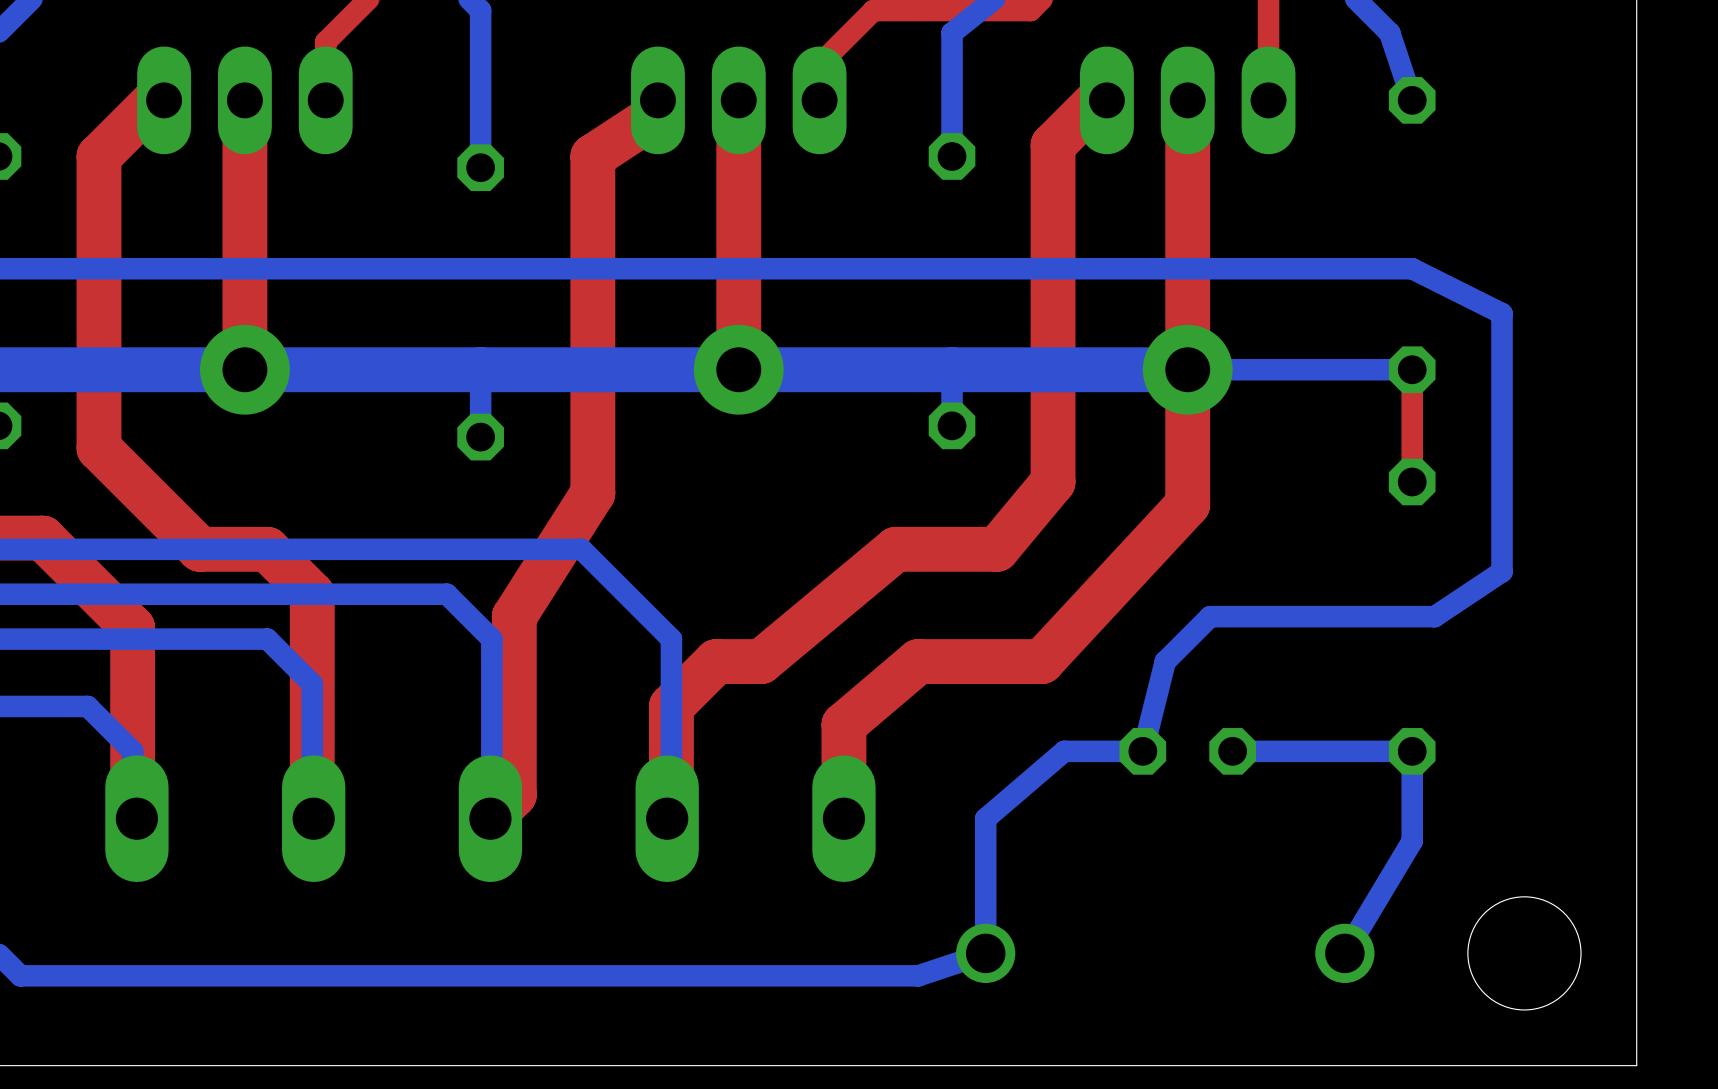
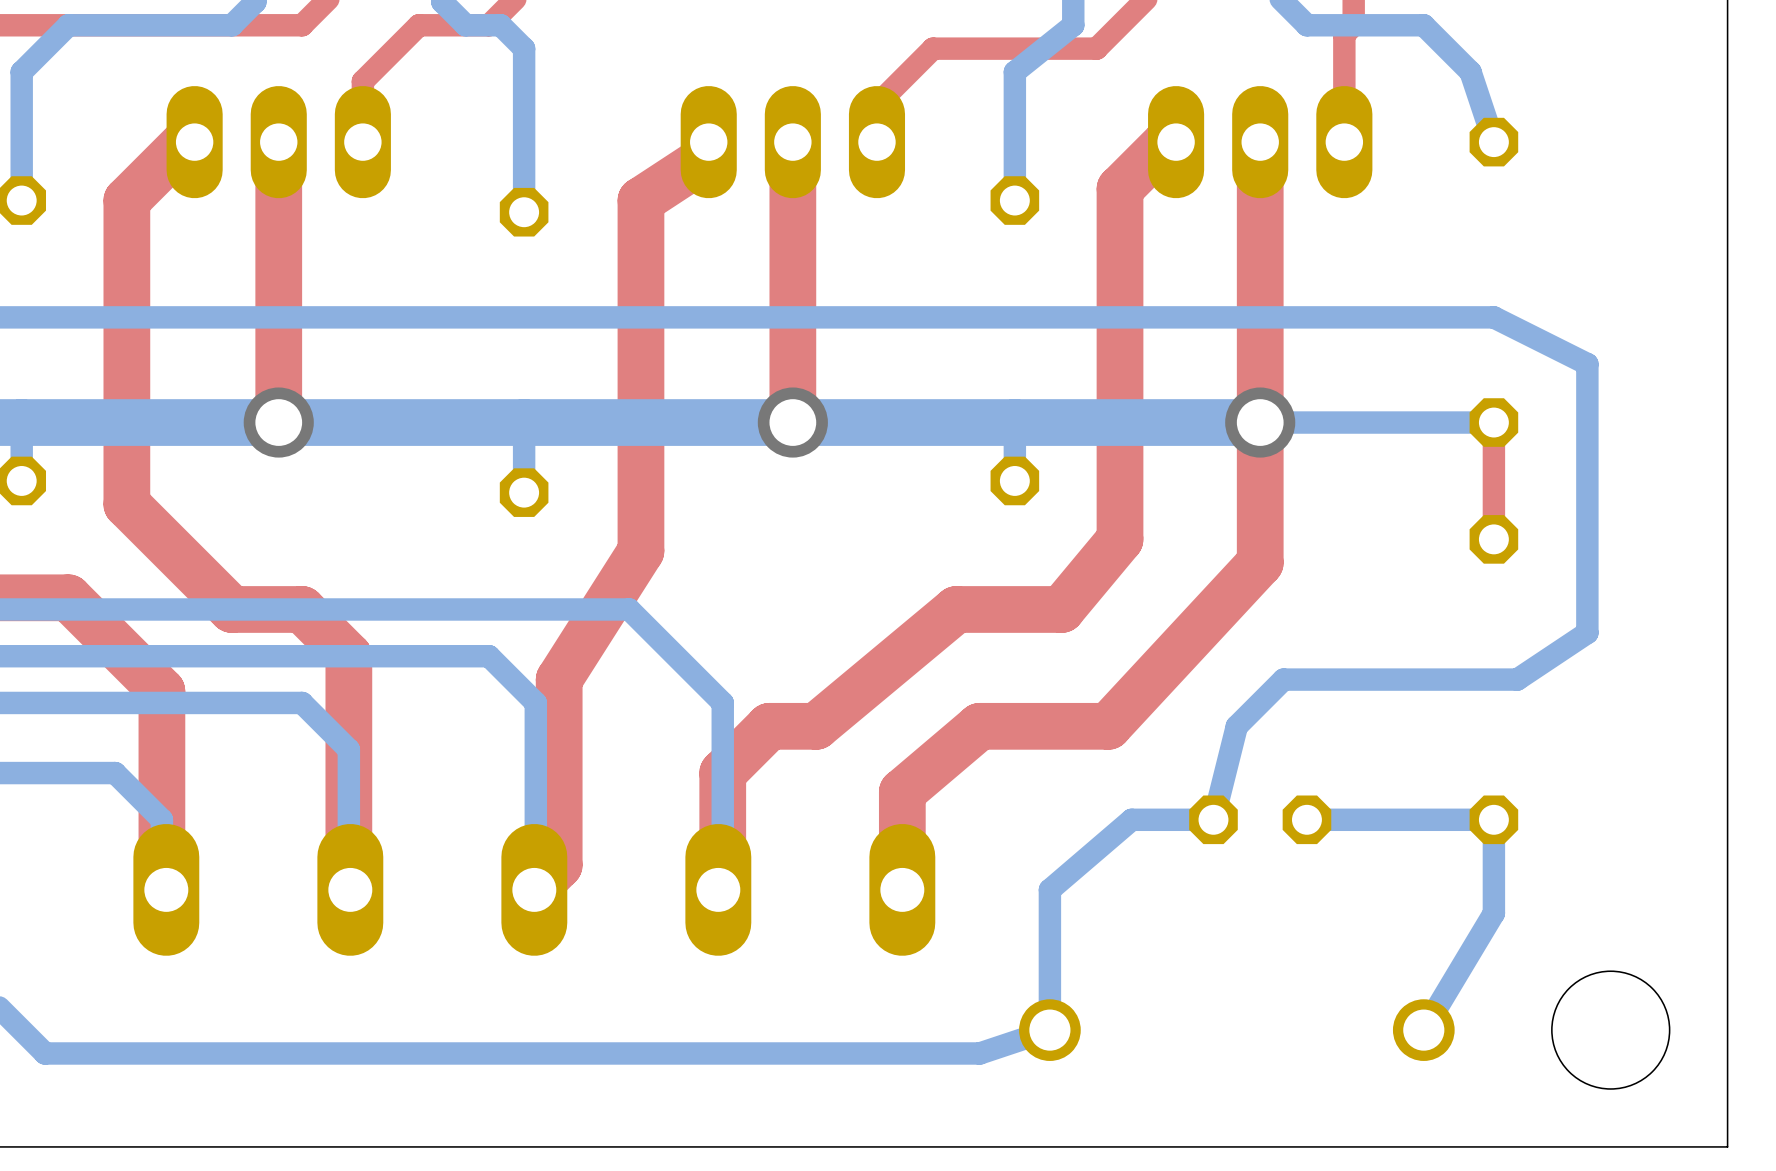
via size: [200, 324, 290, 415] -> [243, 387, 314, 458]
via size: [693, 324, 784, 415] -> [757, 387, 828, 458]
via size: [1142, 324, 1233, 415] -> [1225, 387, 1296, 458]

